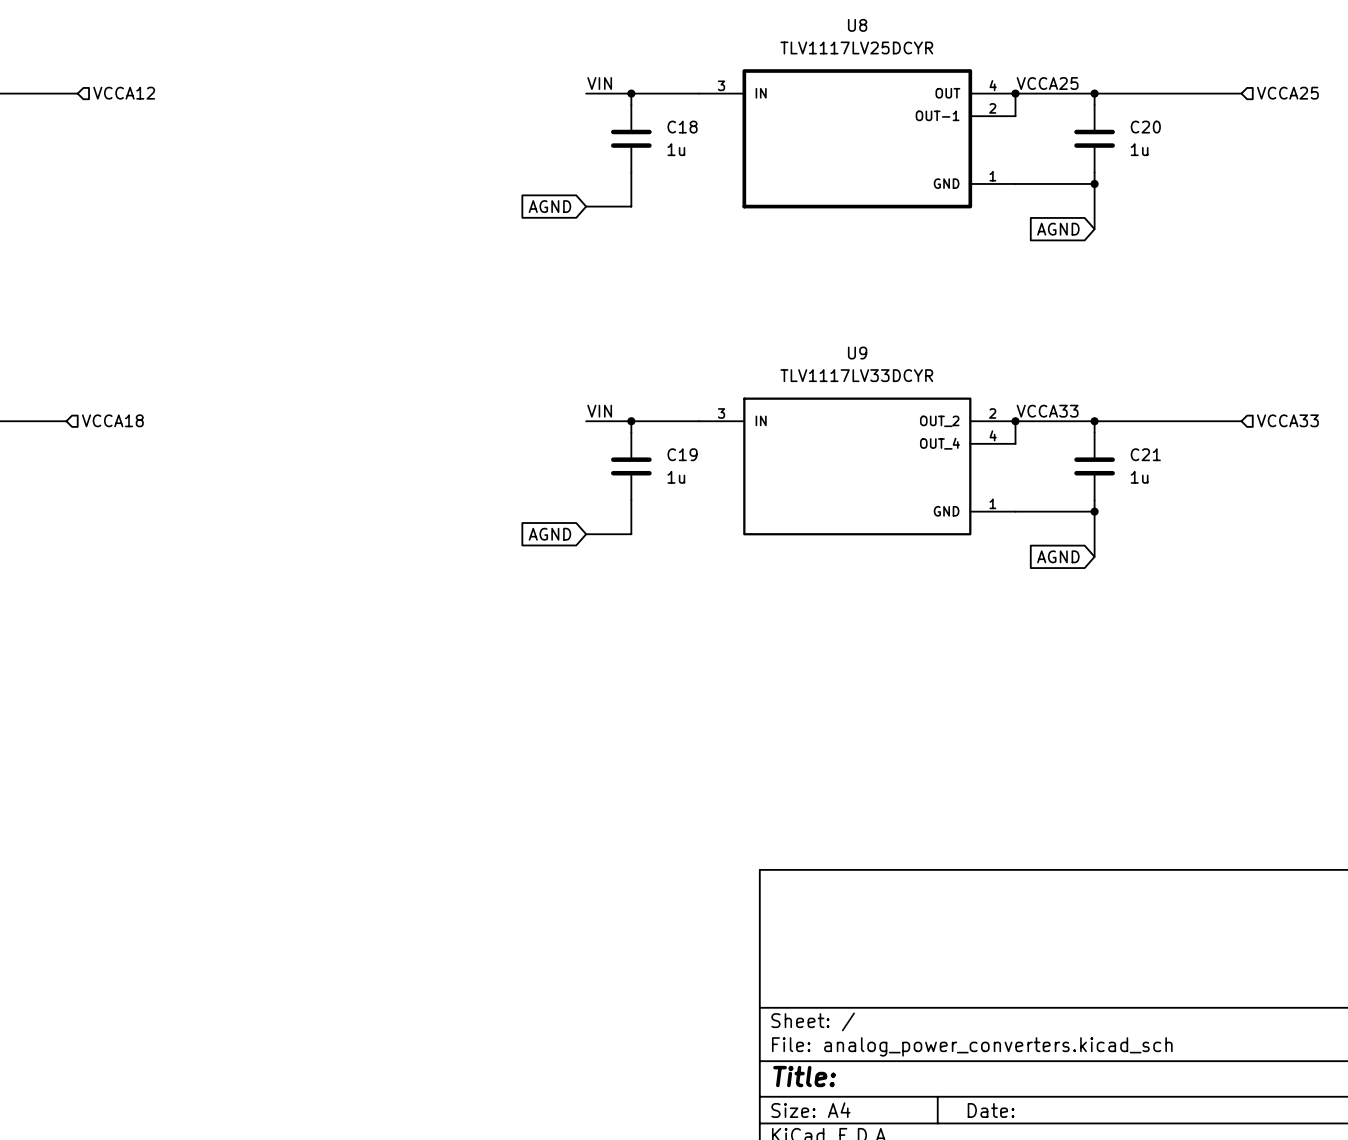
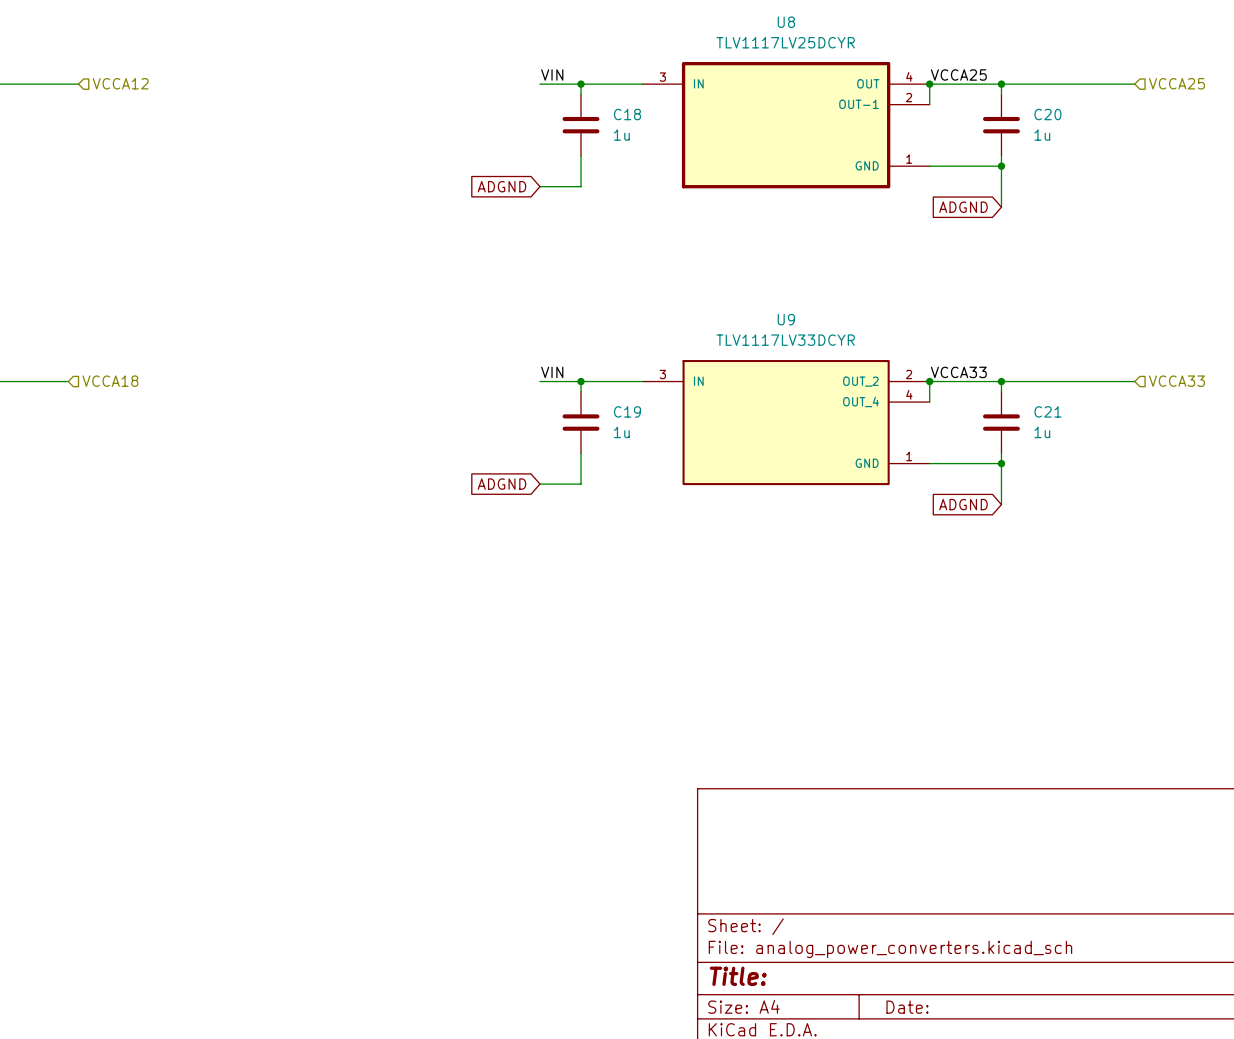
global label: AGND (549, 206) -> ADGND (502, 186)
global label: AGND (1058, 229) -> ADGND (963, 207)
global label: AGND (549, 534) -> ADGND (502, 484)
global label: AGND (1058, 556) -> ADGND (963, 504)

